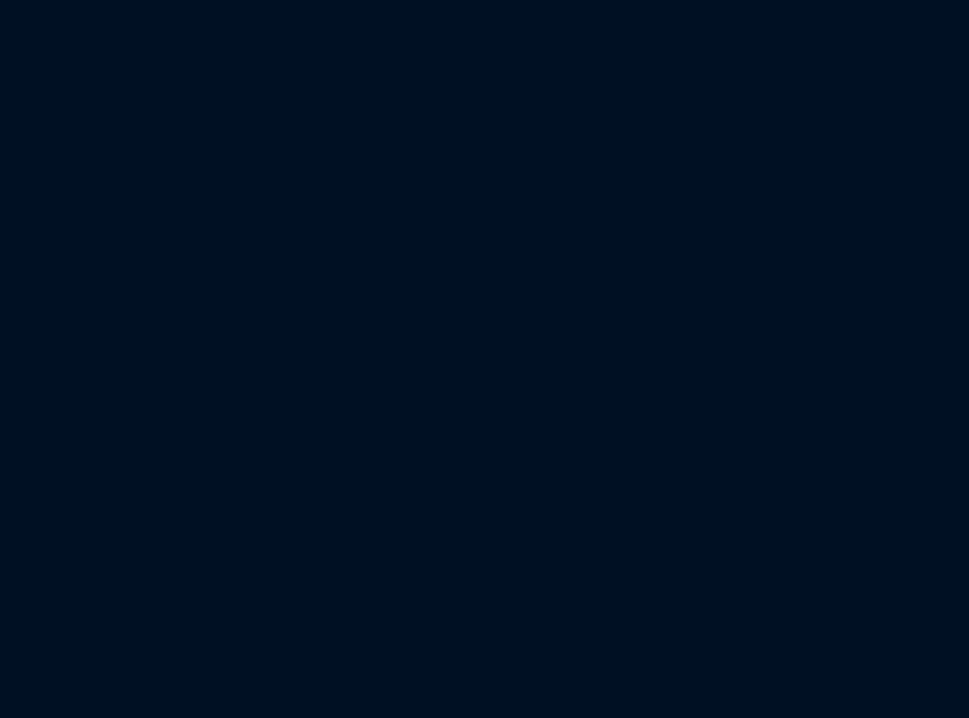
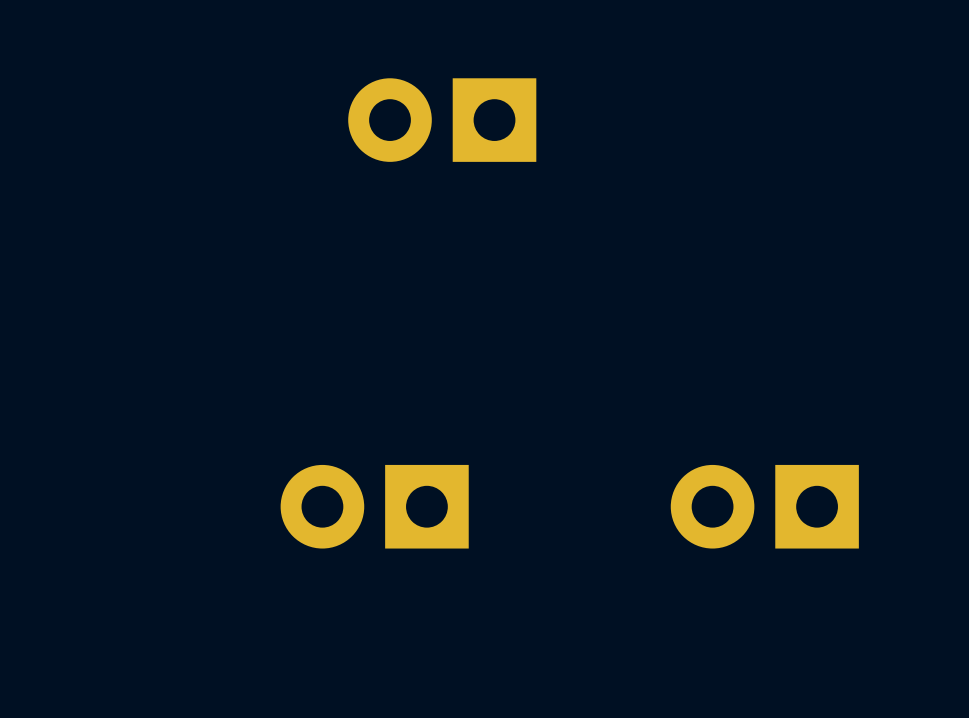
part: none -> (442, 120)
part: none -> (374, 506)
part: none -> (764, 506)

